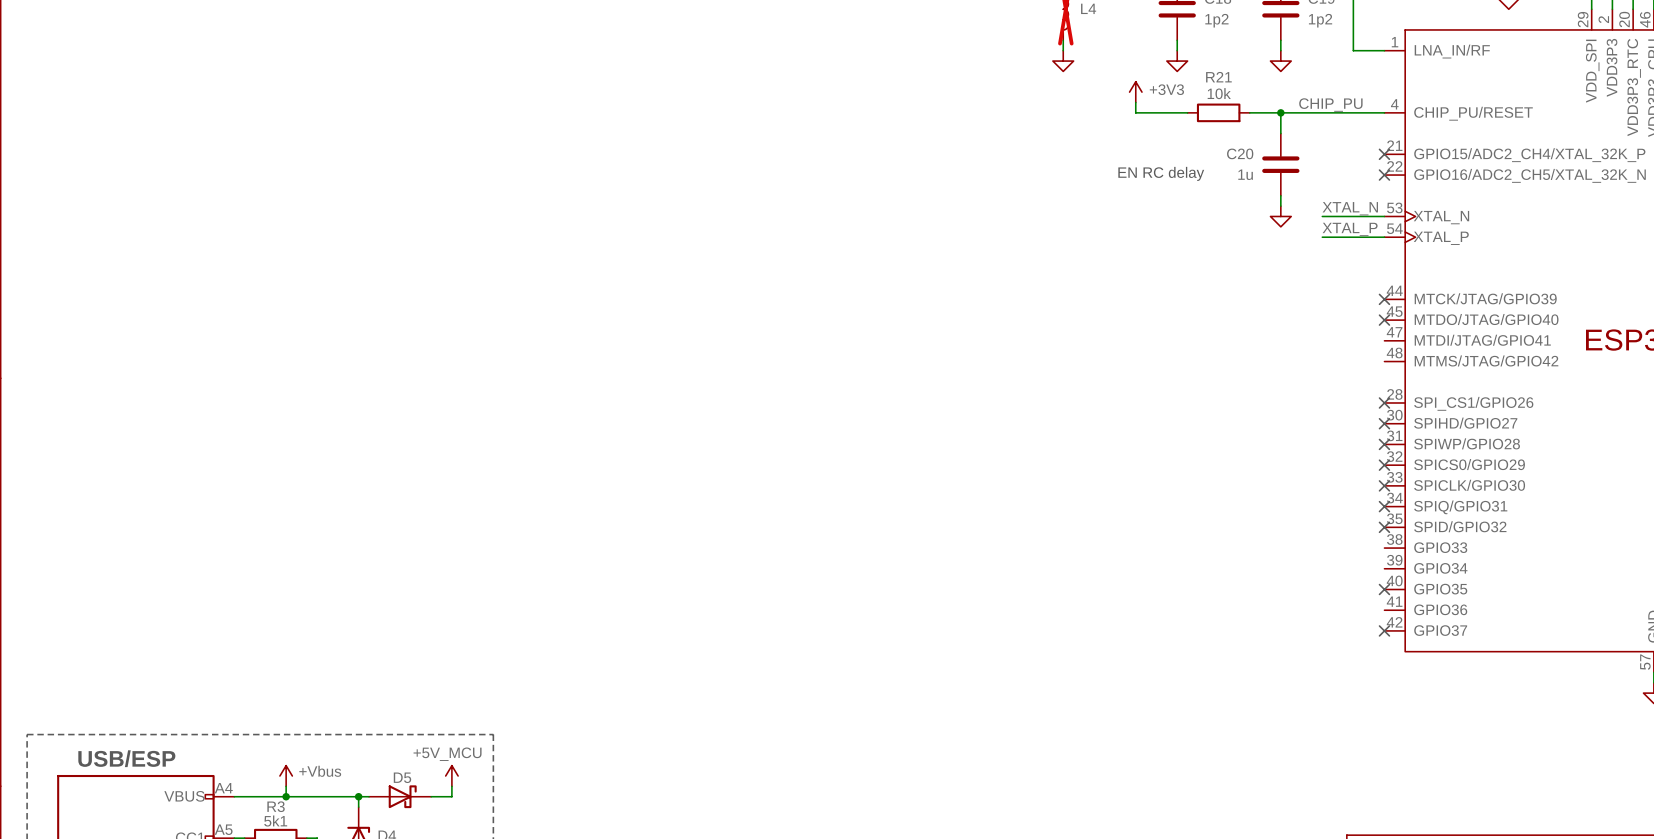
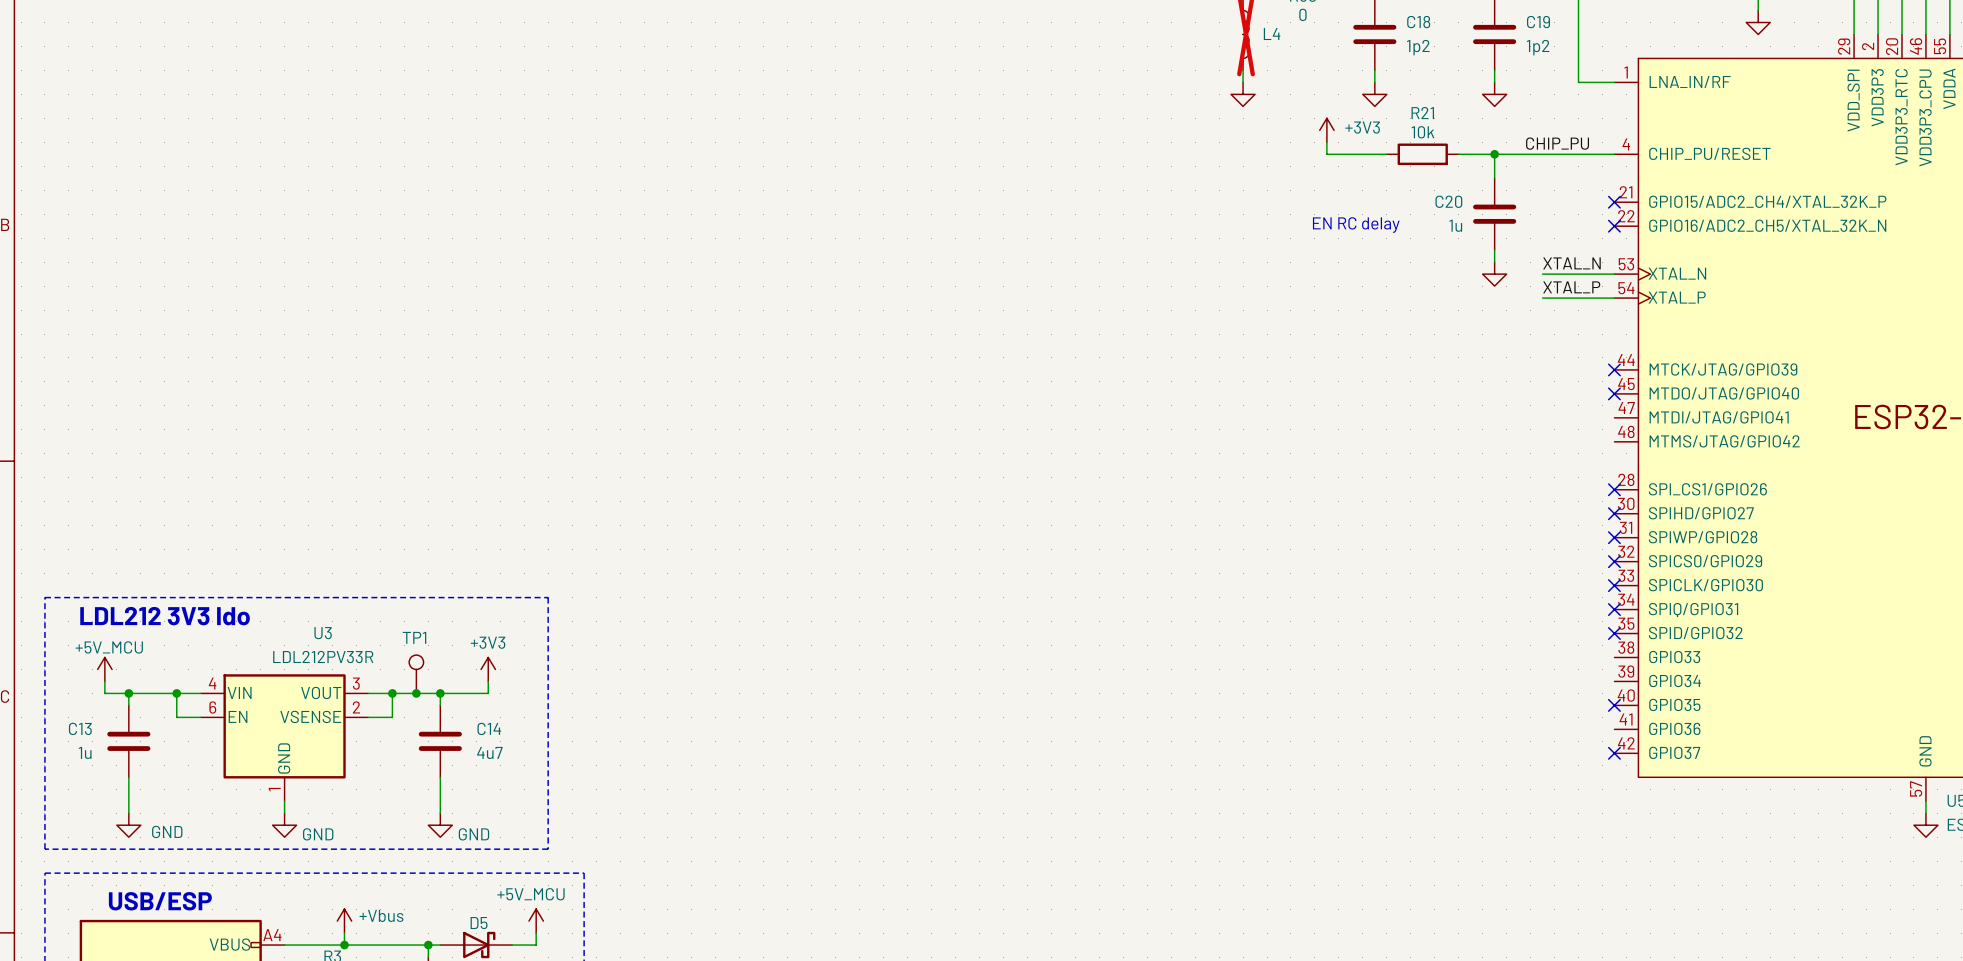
line: none -> (44, 597) (548, 597) (548, 849) (44, 849) (44, 597)
text: none -> LDL212 3V3 ldo (165, 616)
power symbol: none -> +5V_MCU (104, 669)
power symbol: none -> +3V3 (488, 669)
TP1: none -> (416, 674)
wire: none -> (104, 681) (104, 693) (200, 693)
wire: none -> (488, 681) (488, 693) (368, 693)
wire: none -> (128, 693) (128, 705)
junction: none -> (128, 693)
wire: none -> (176, 693) (176, 717) (200, 717)
junction: none -> (176, 693)
wire: none -> (392, 693) (392, 717) (368, 717)
junction: none -> (392, 693)
junction: none -> (416, 693)
wire: none -> (440, 693) (440, 705)
junction: none -> (440, 693)
U3: none -> LDL212PV33R (284, 737)
C13: none -> 1u (128, 741)
C14: none -> 4u7 (440, 741)
wire: none -> (128, 777) (128, 813)
wire: none -> (440, 777) (440, 813)
wire: none -> (284, 801) (284, 813)
power symbol: none -> GND (128, 825)
power symbol: none -> GND (284, 825)
power symbol: none -> GND (440, 825)

